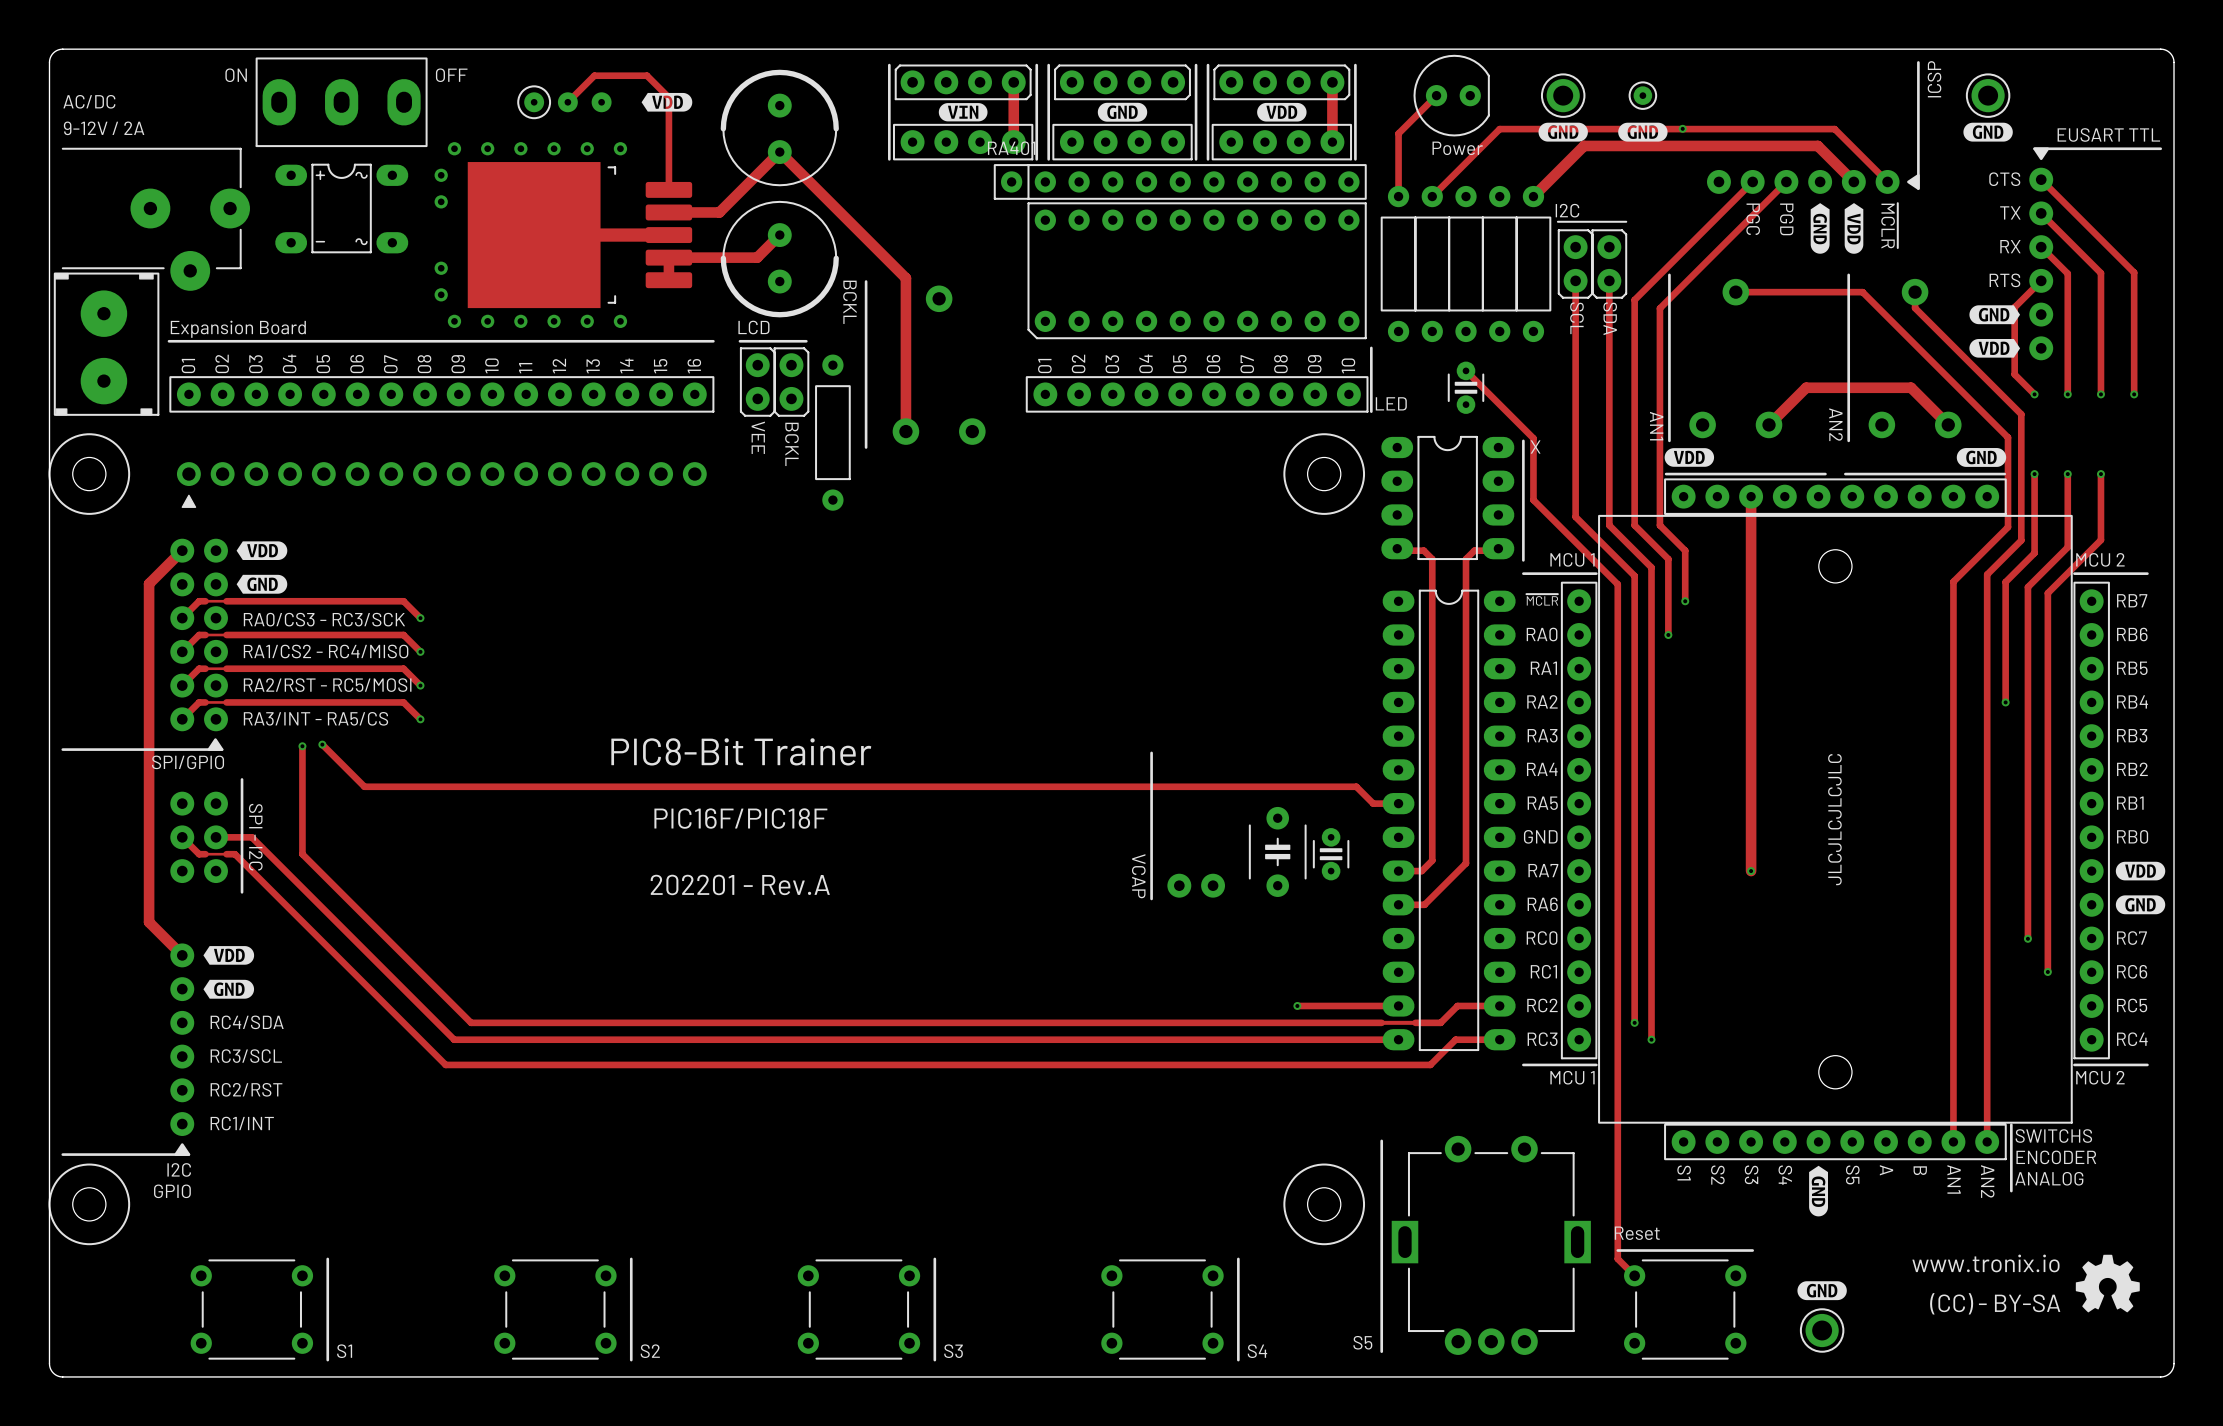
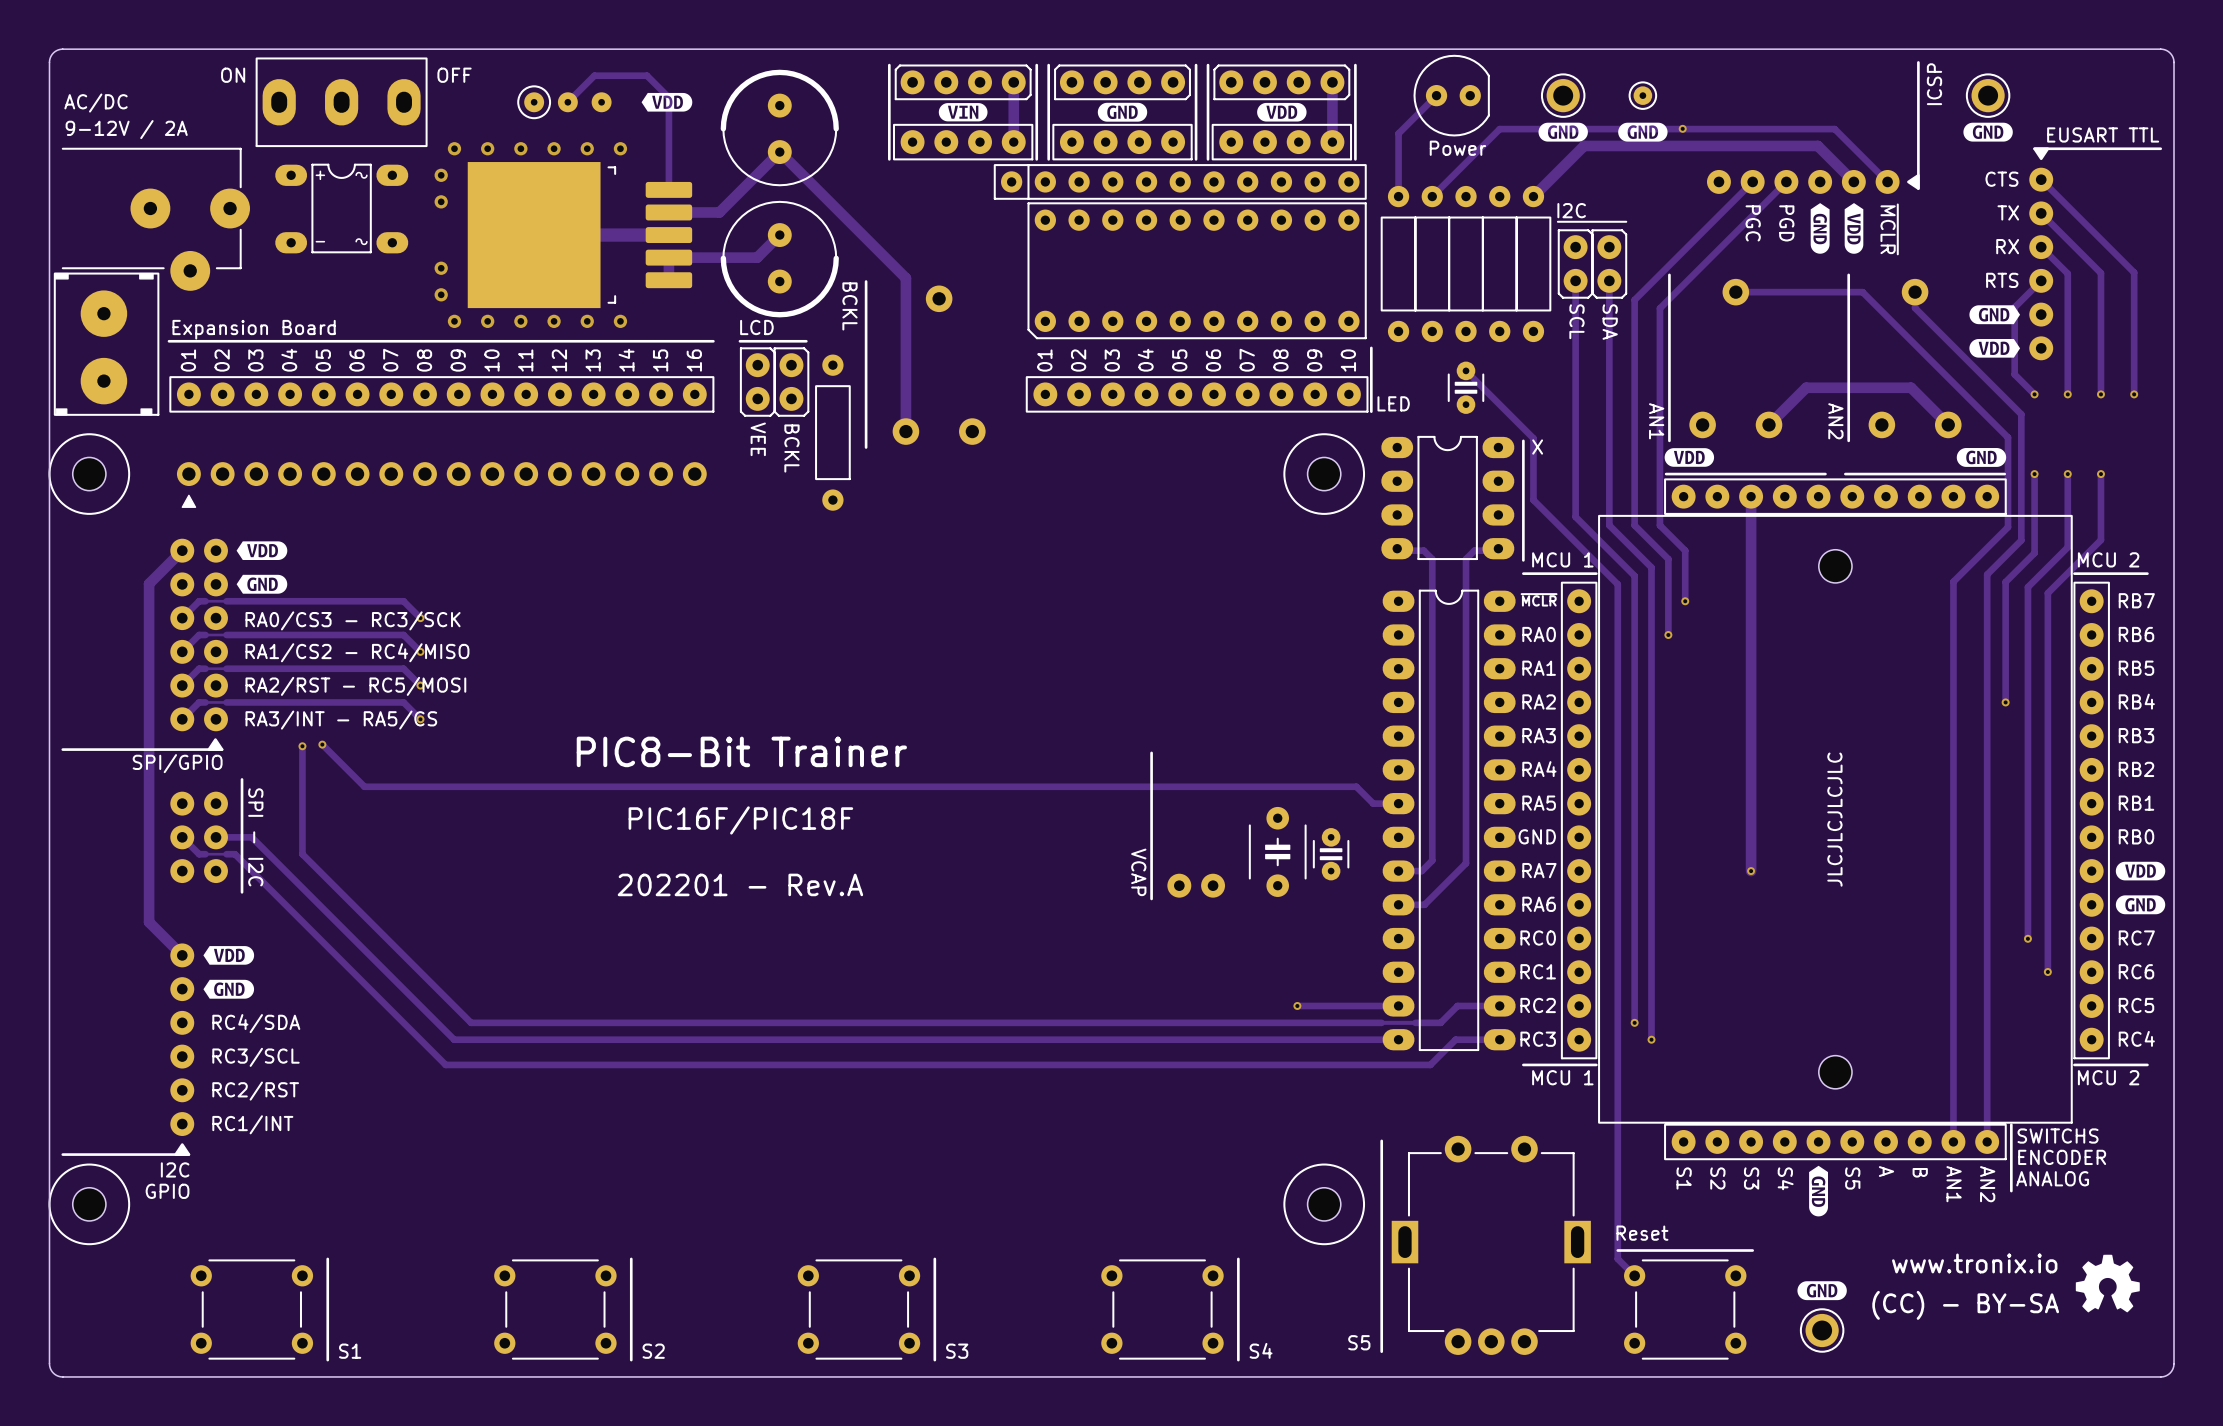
RA401 name: RA401 (1011, 148) -> none

